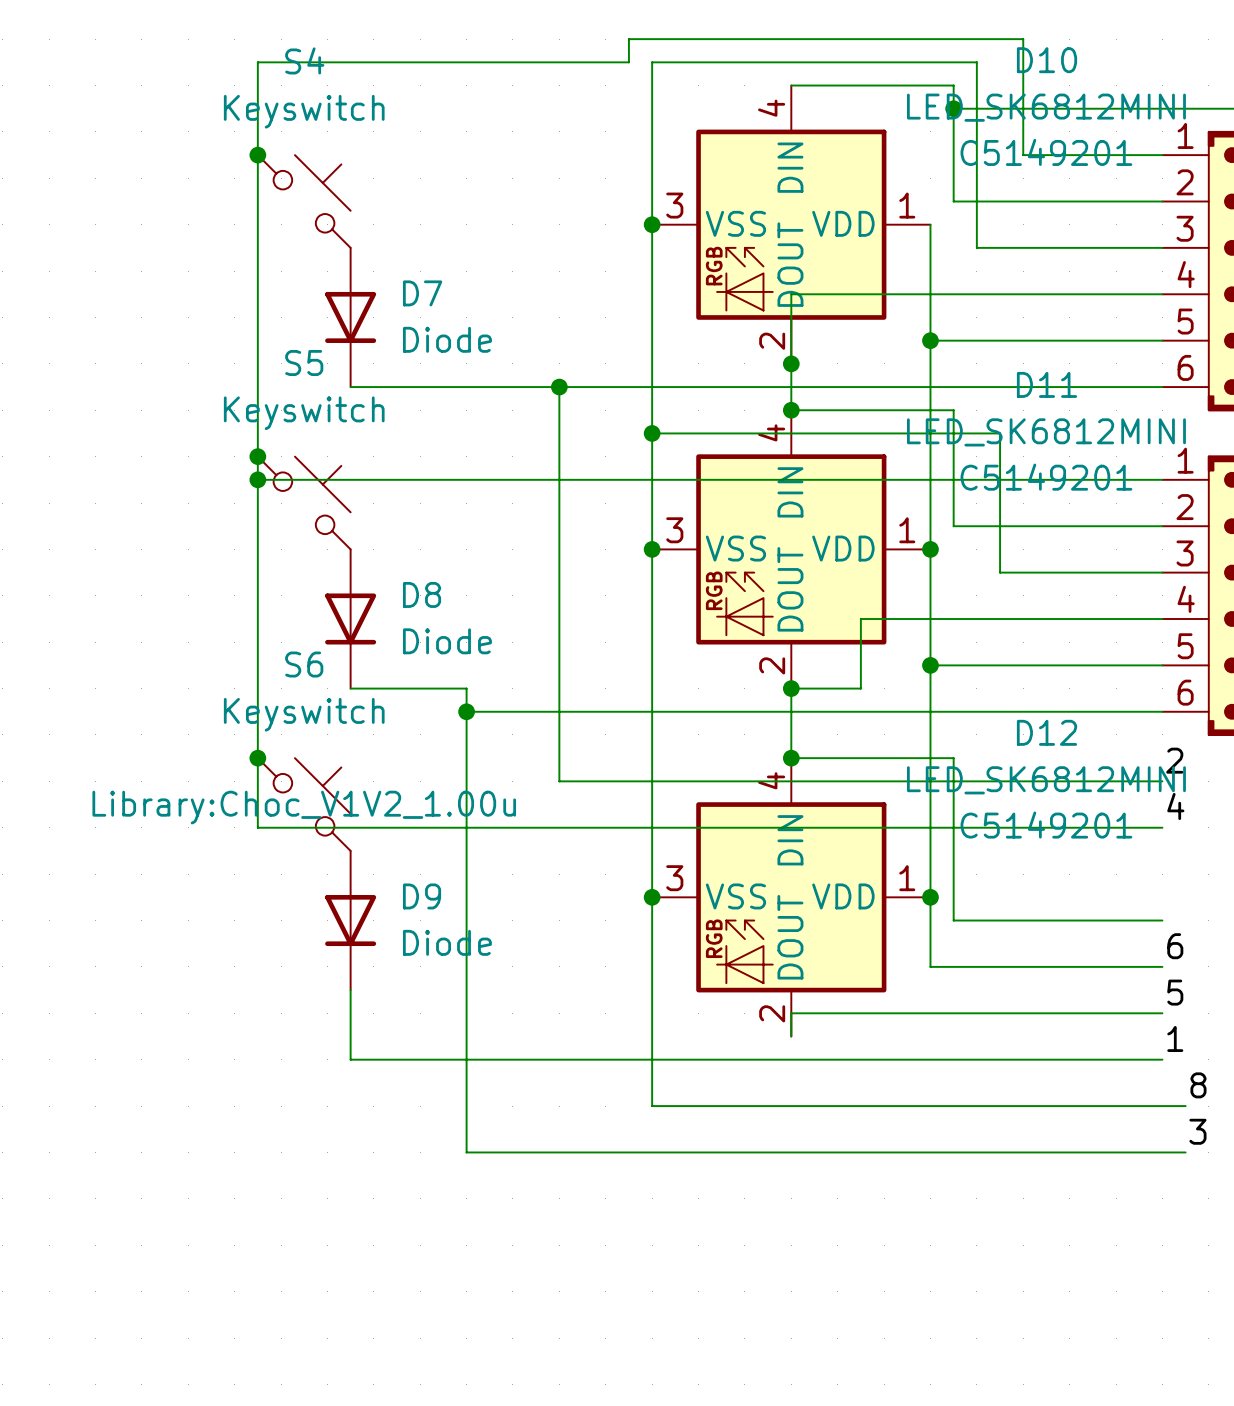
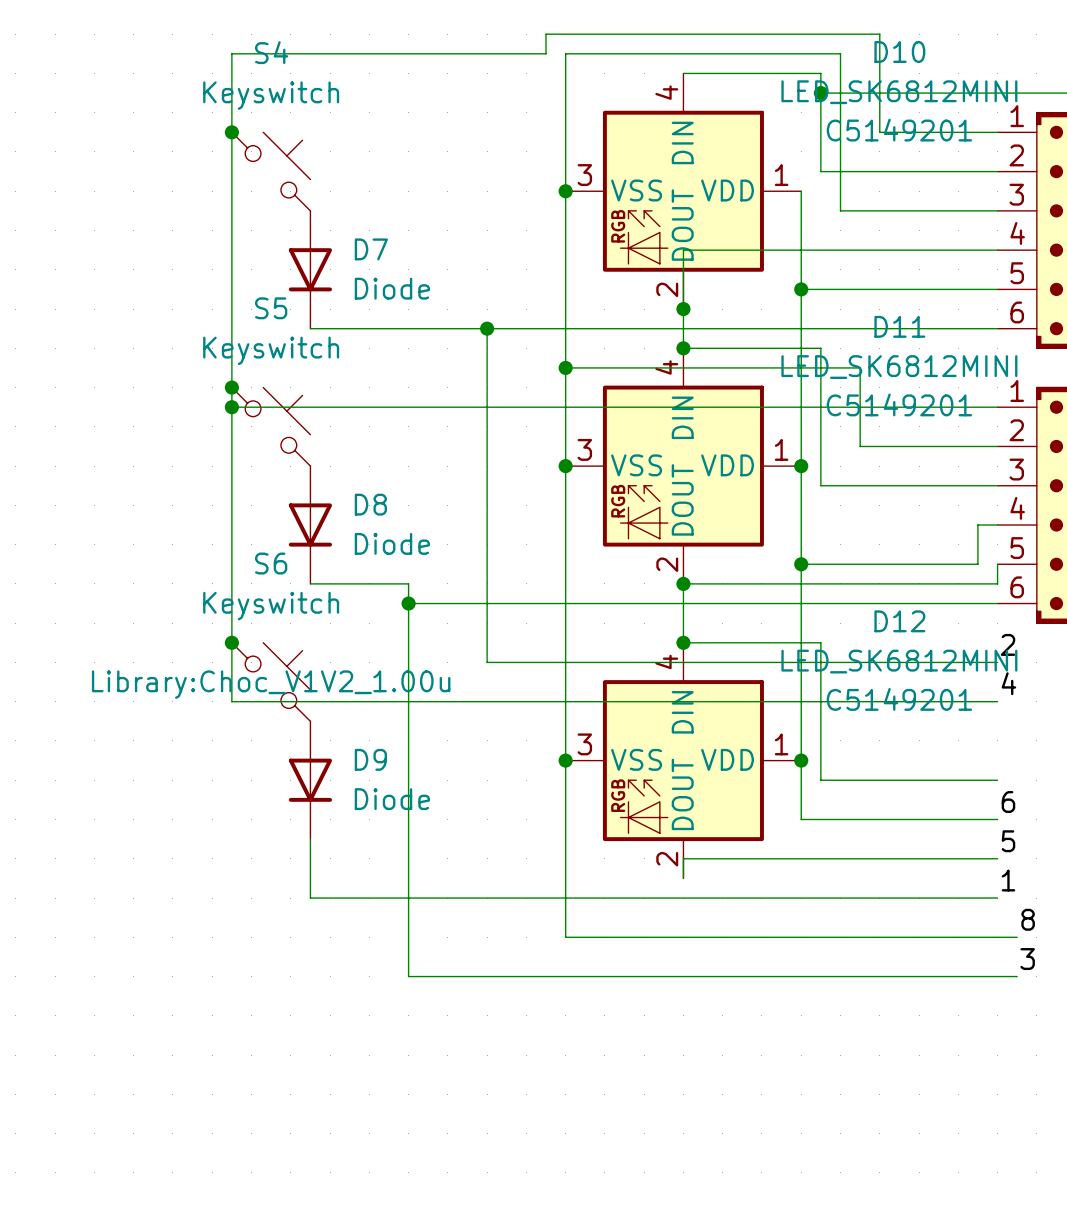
wire: (953, 526) (1000, 526) (1000, 572) -> (820, 446) (820, 485) (860, 485)
wire: (1139, 618) (860, 618) (860, 688) -> (997, 564) (997, 583) (742, 583)
wire: (1139, 665) (1162, 665) -> (977, 564) (977, 525)

